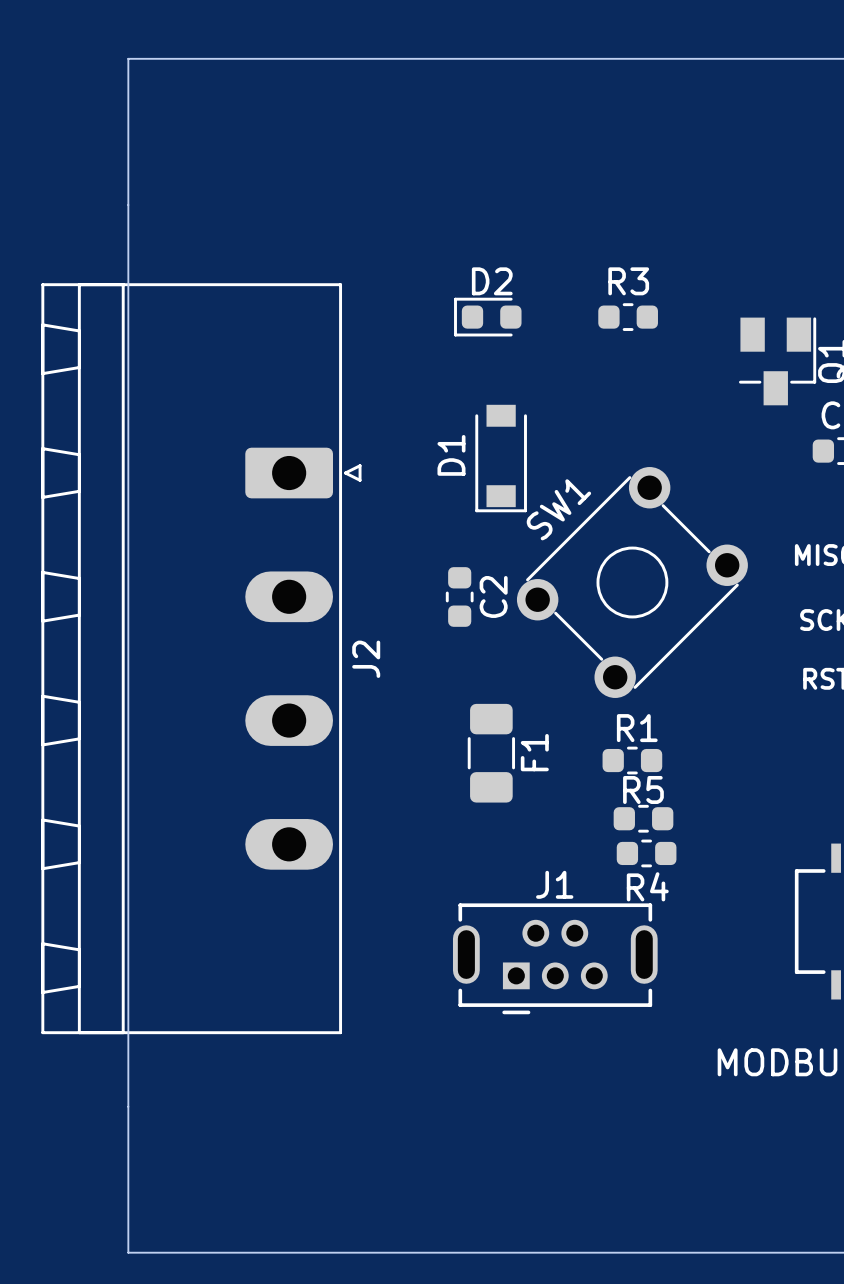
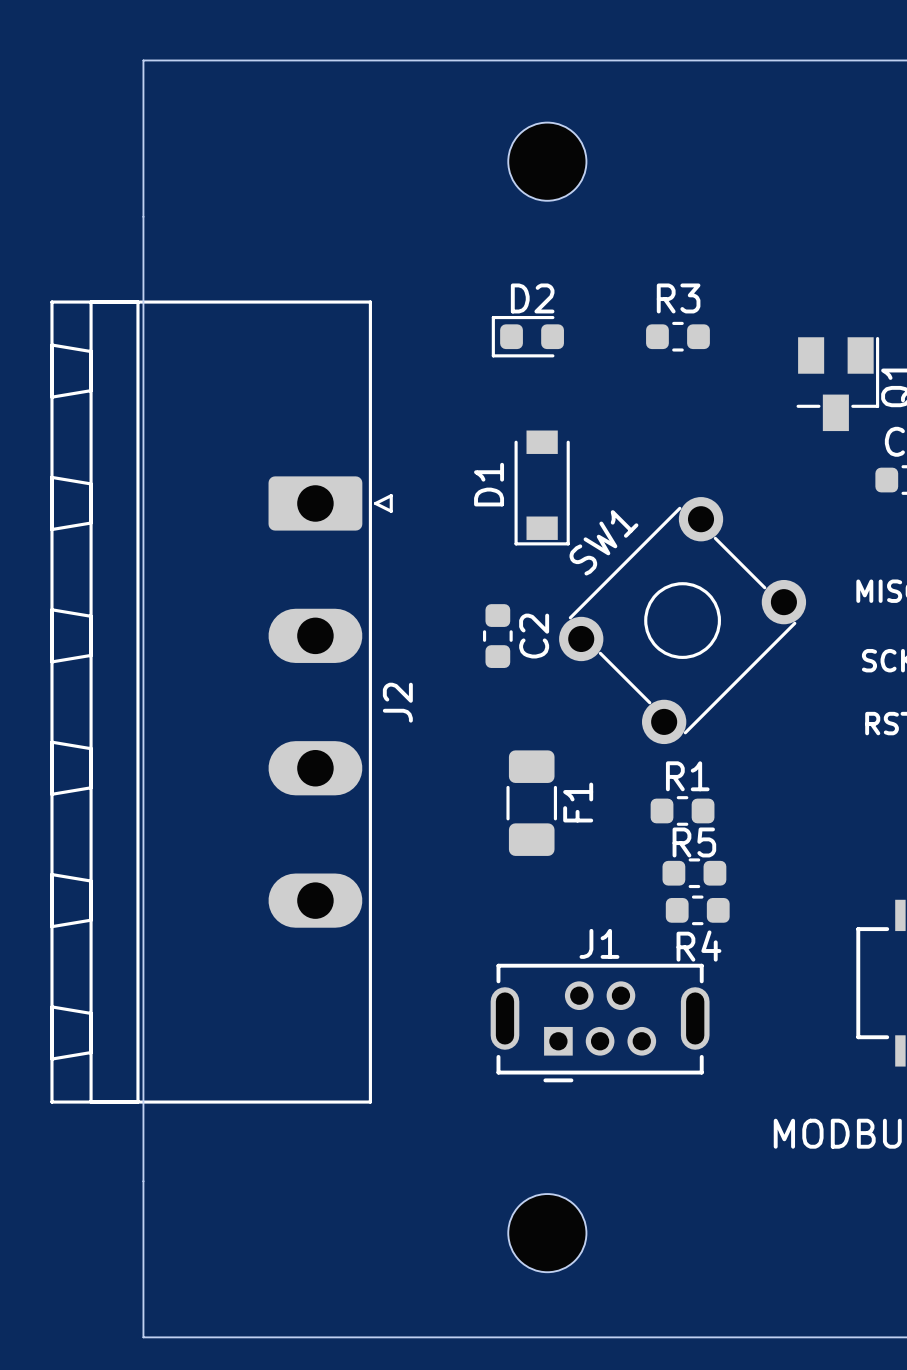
part: none -> (547, 161)
part: none -> (547, 1233)

